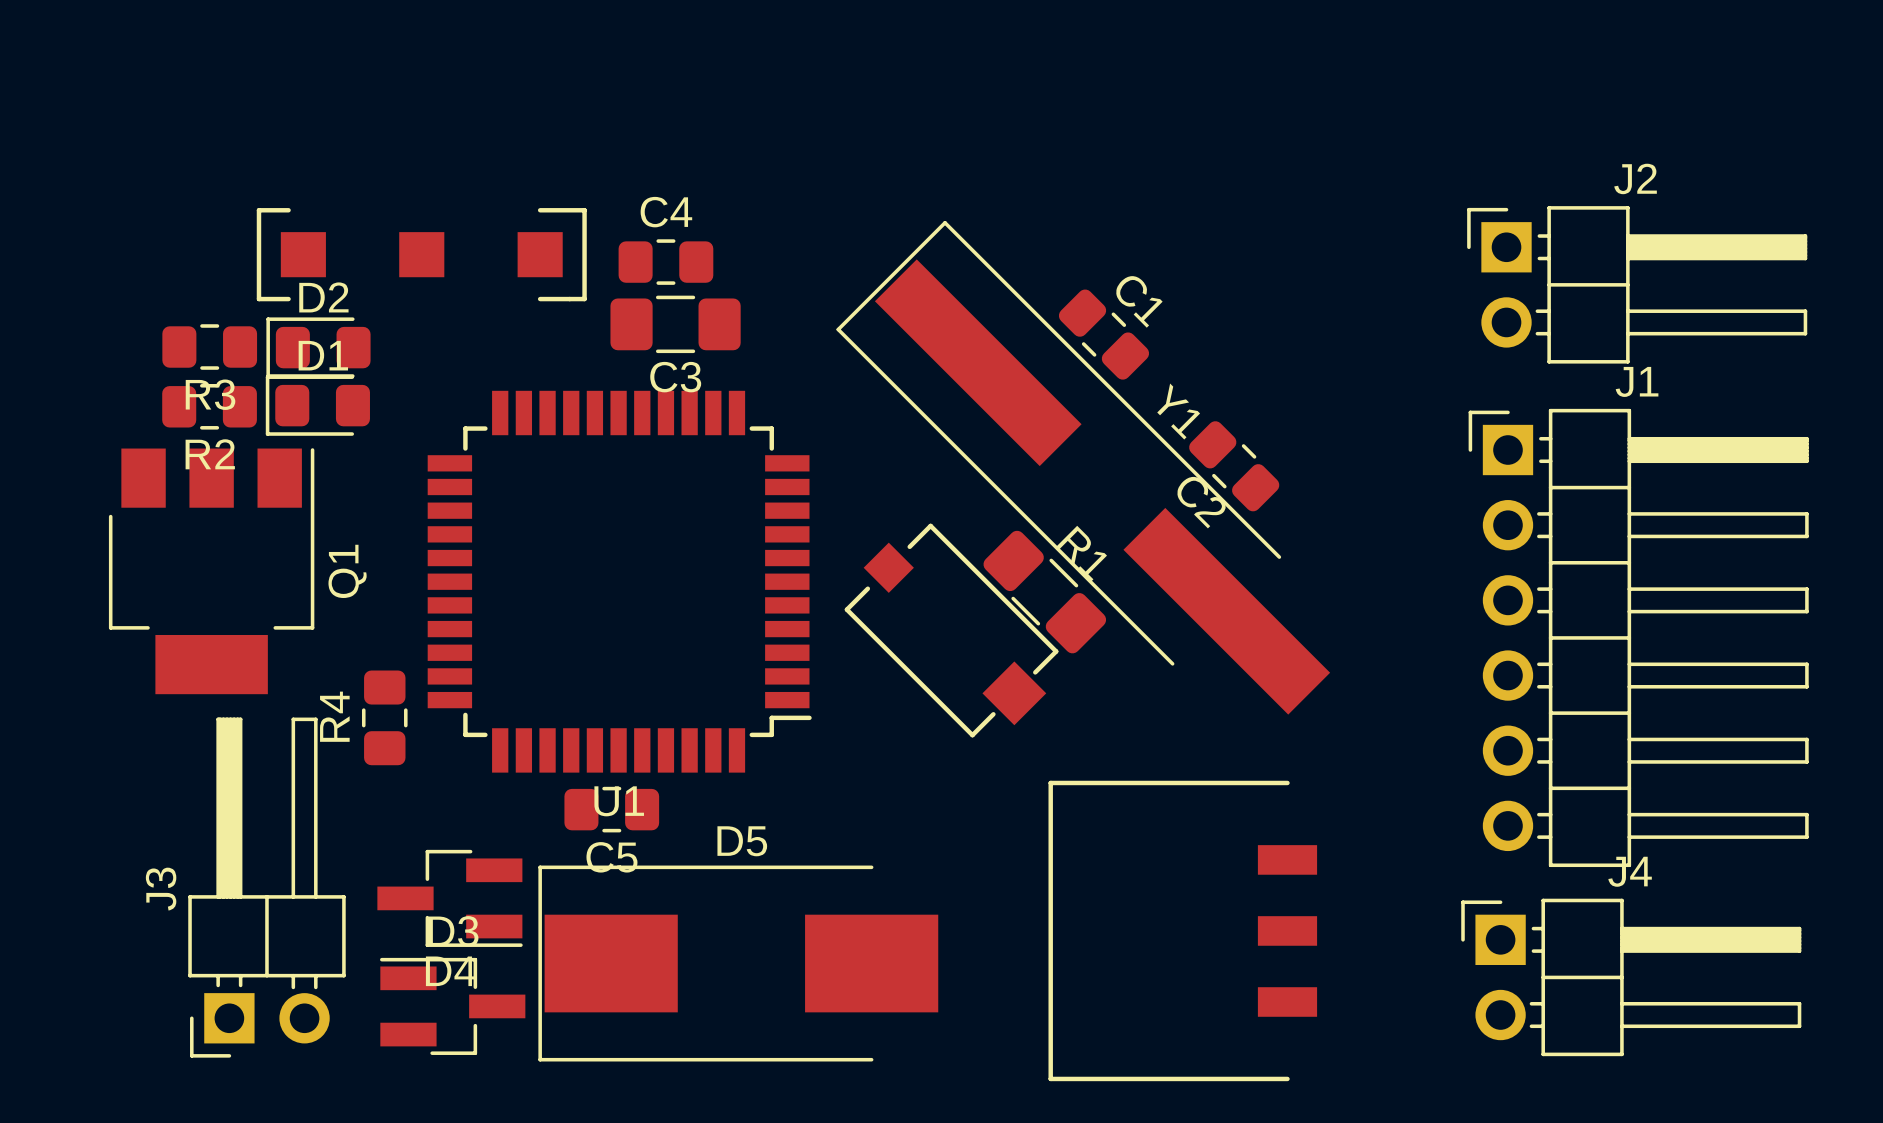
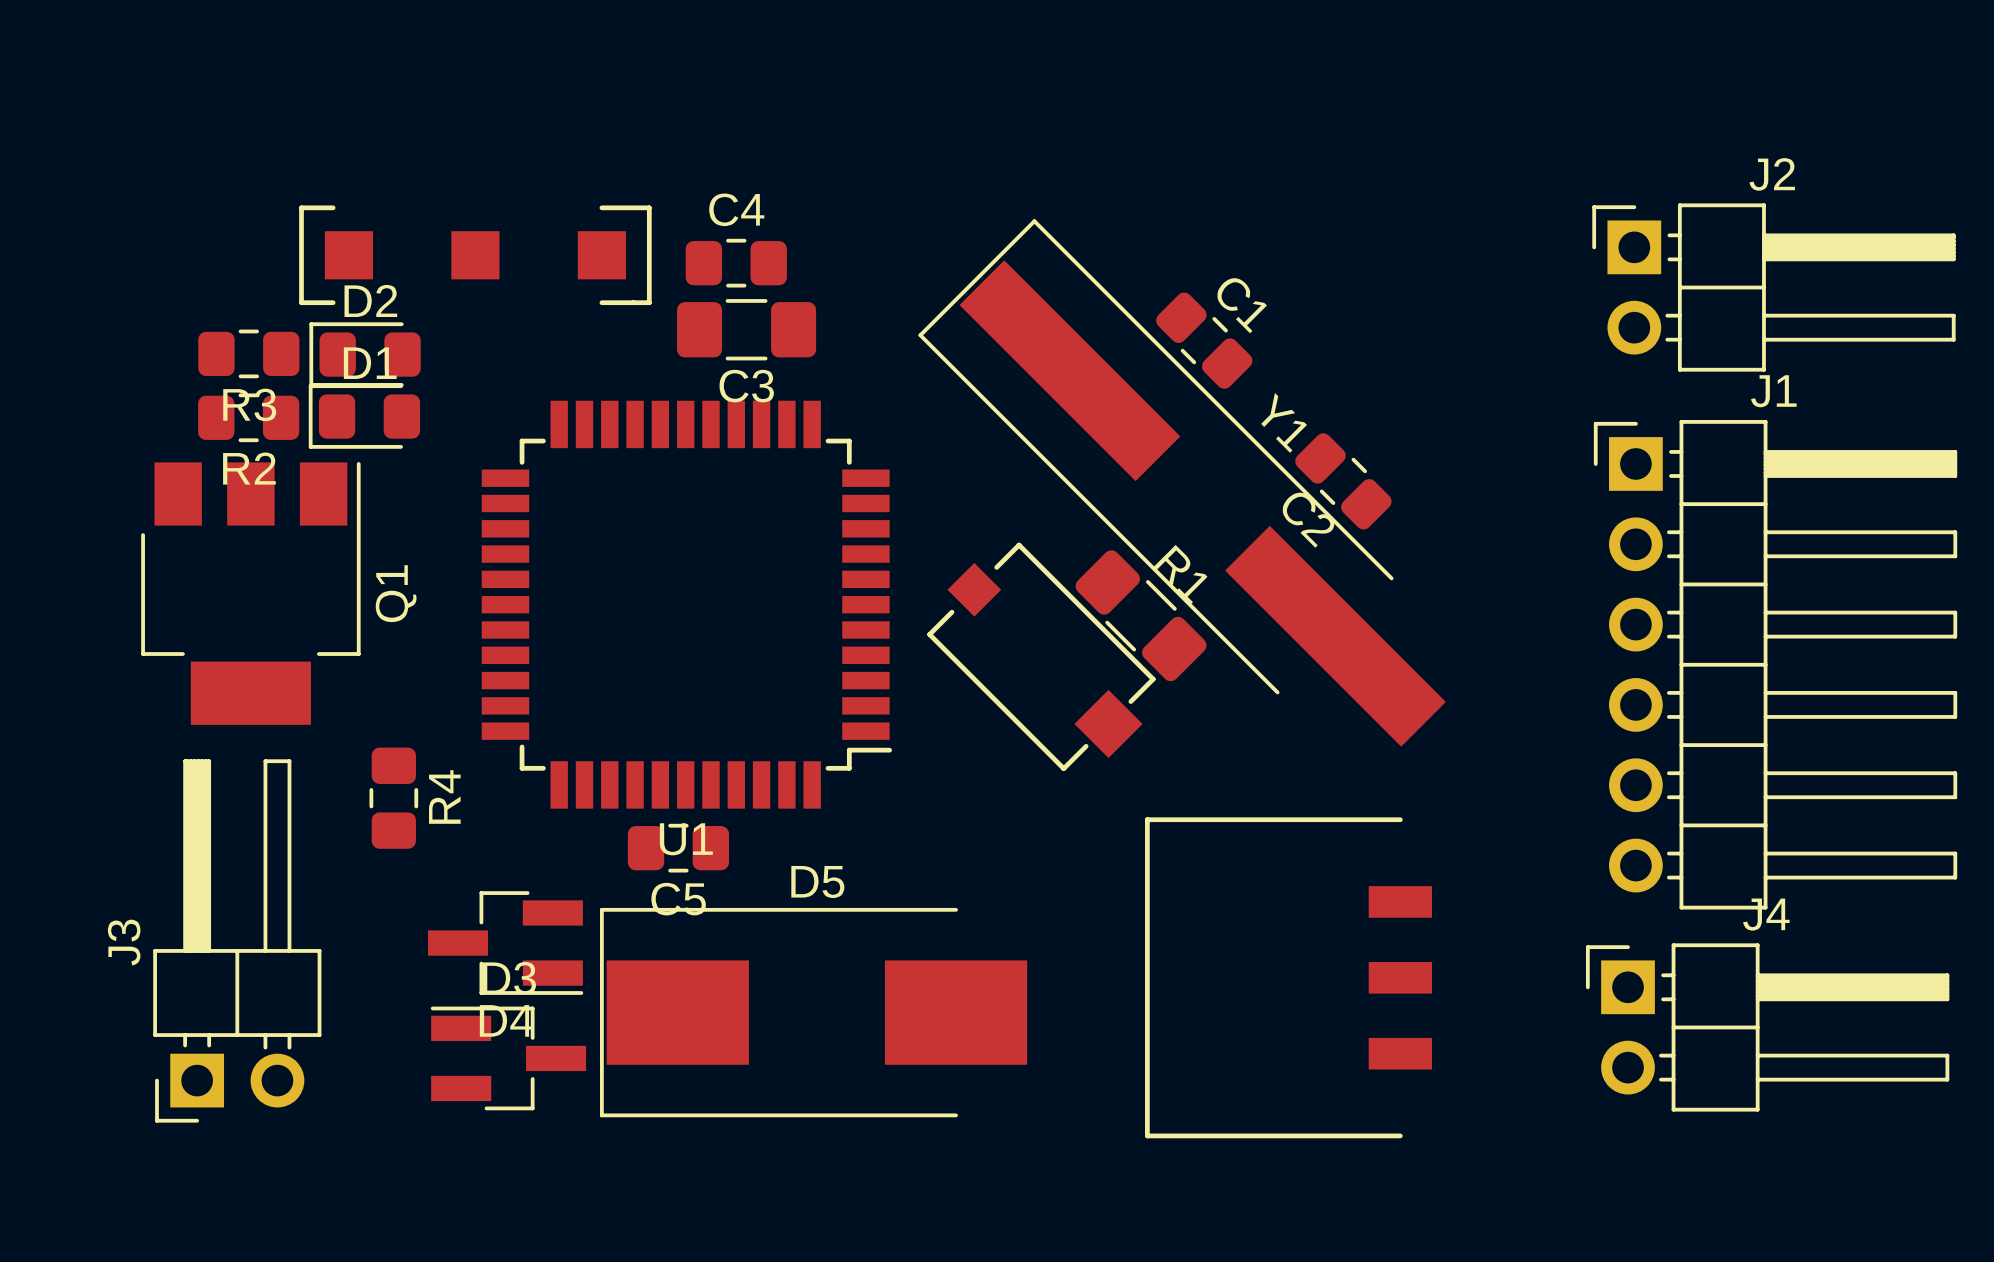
R4 name position: R4 (334, 716) -> R4 (444, 796)
R4 position: (384, 717) -> (393, 798)
J3 position: (266, 887) -> (237, 940)

